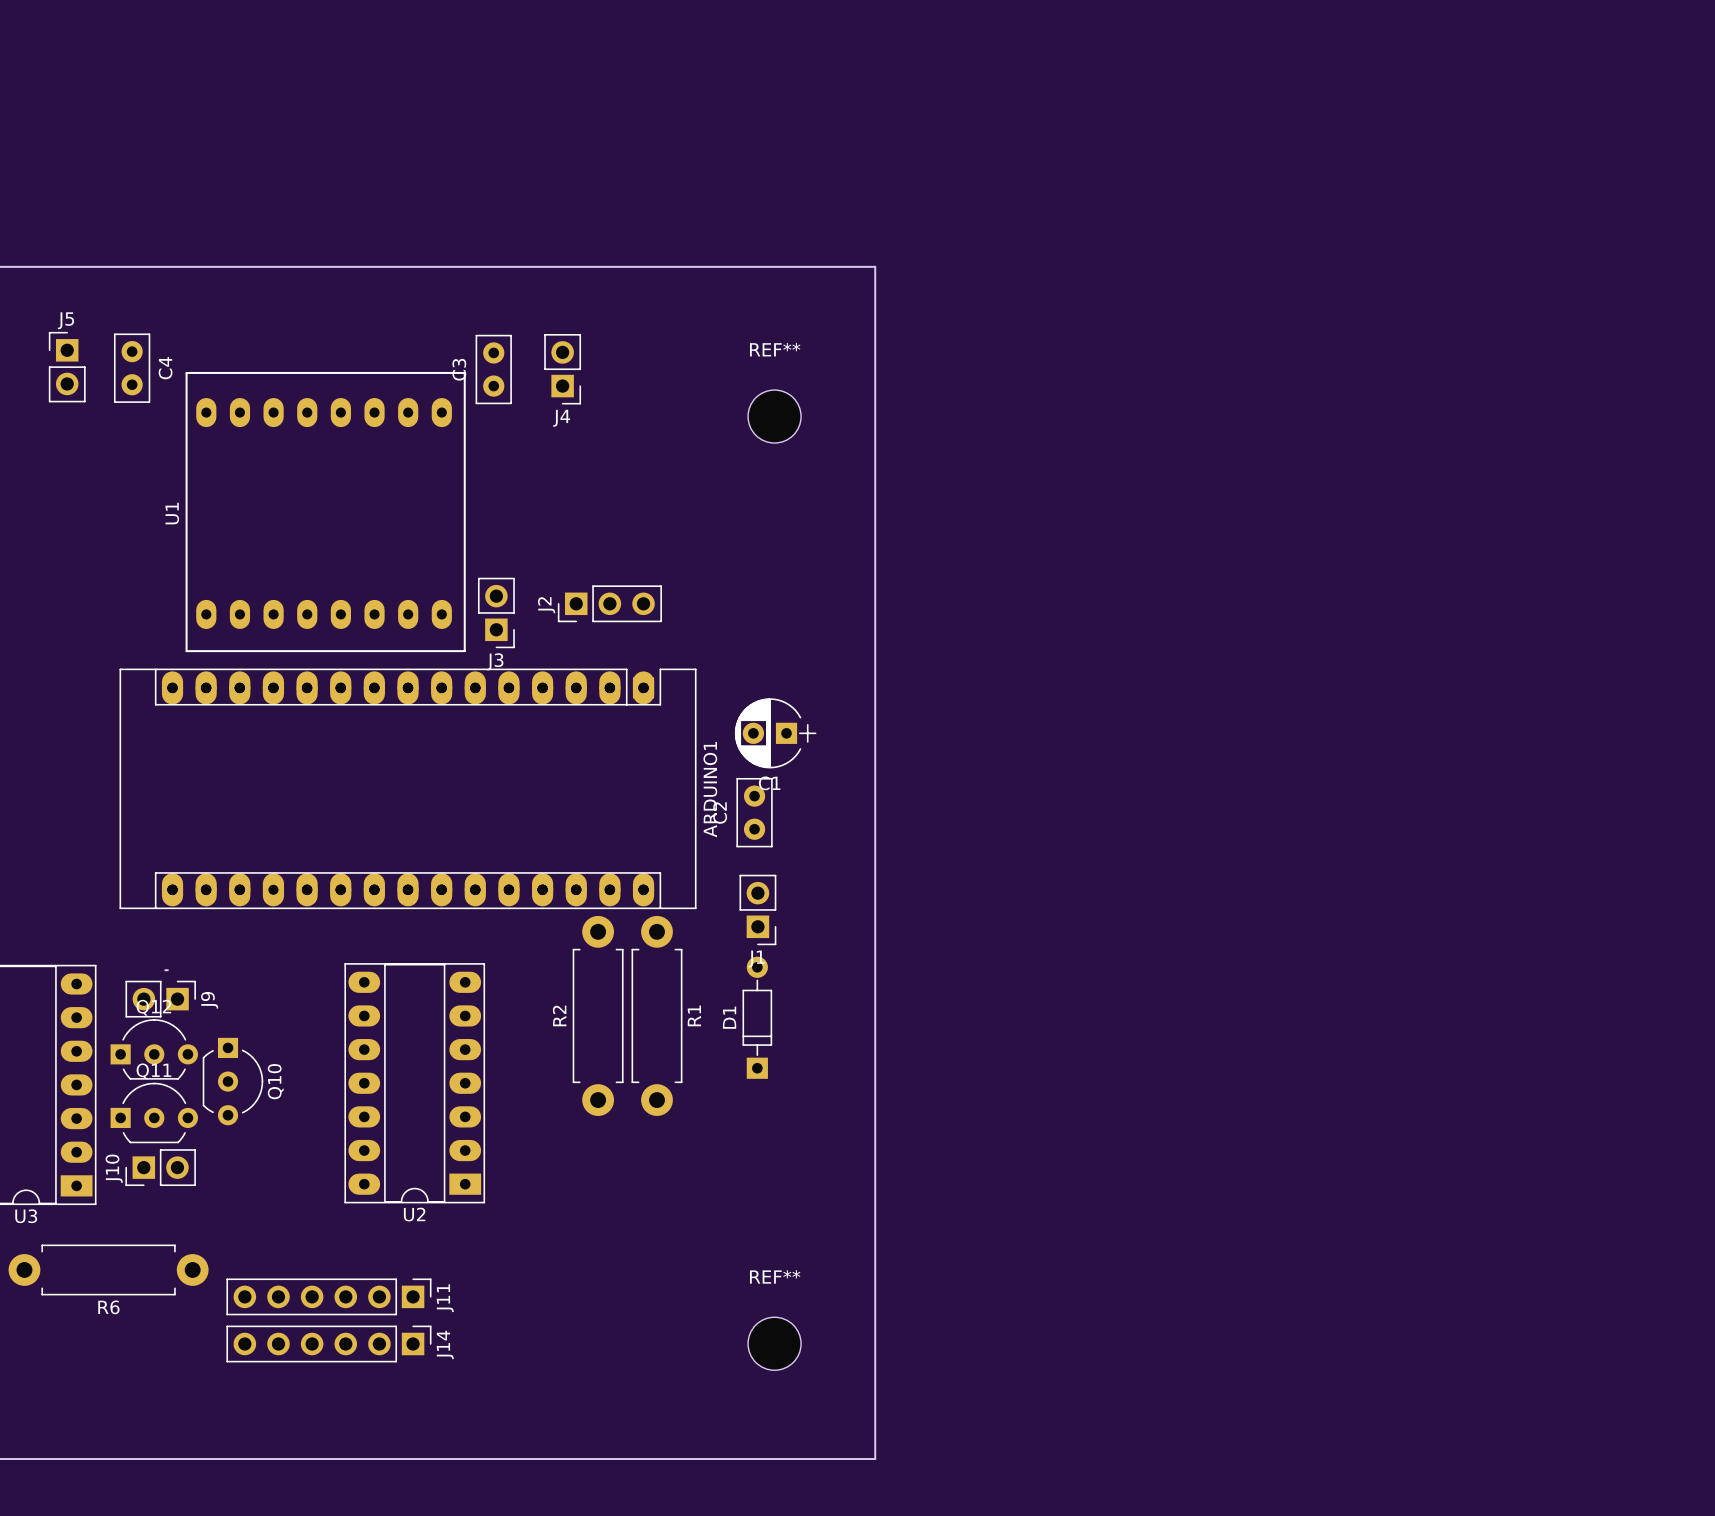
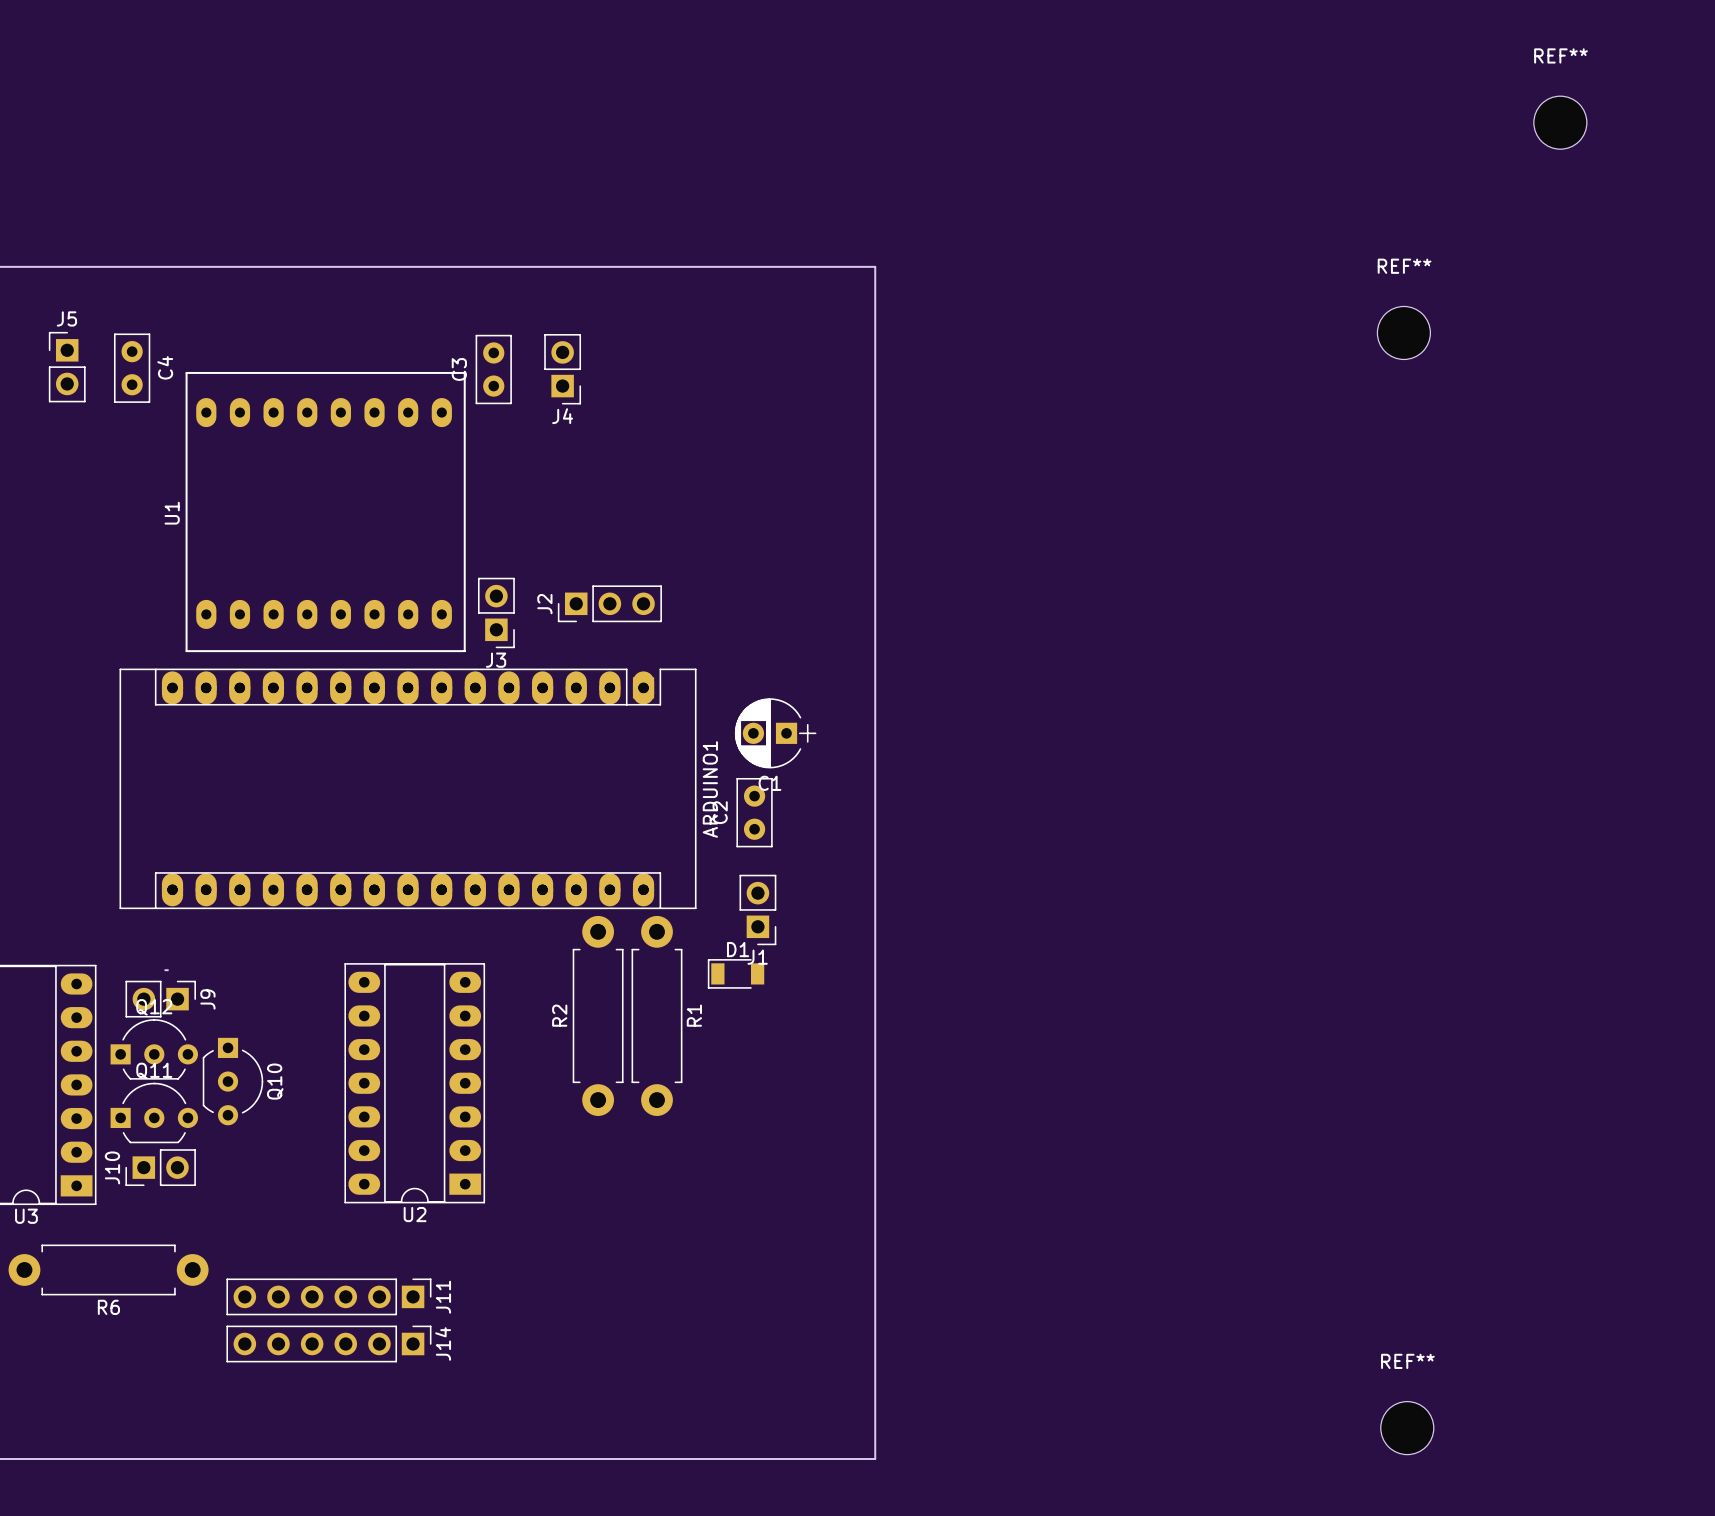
REF**: none -> (1560, 122)
REF**: none -> (1403, 332)
REF**: (774, 416) -> none
D1 footprint: [742, 956, 773, 1079] -> [707, 959, 765, 989]
D1 name position: D1 (729, 1017) -> D1 (738, 949)
REF**: (774, 1343) -> none
REF**: none -> (1407, 1428)

